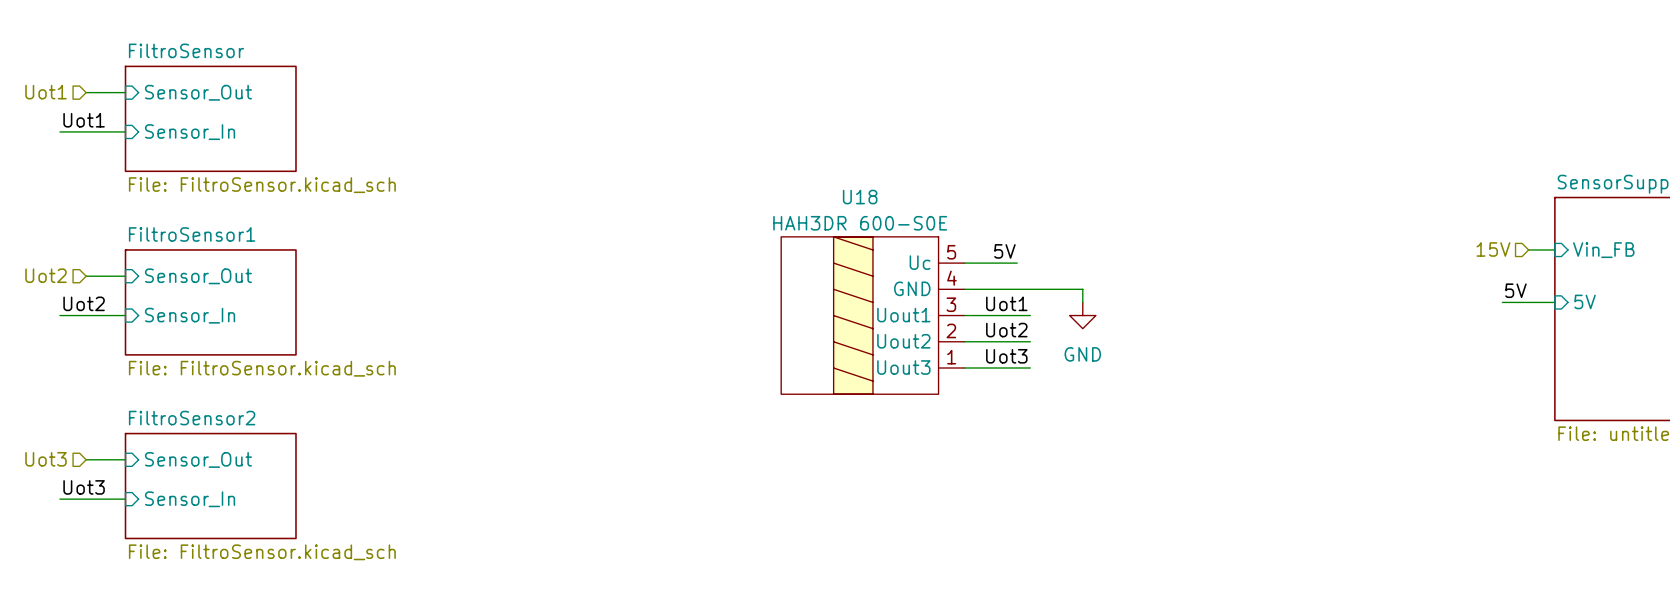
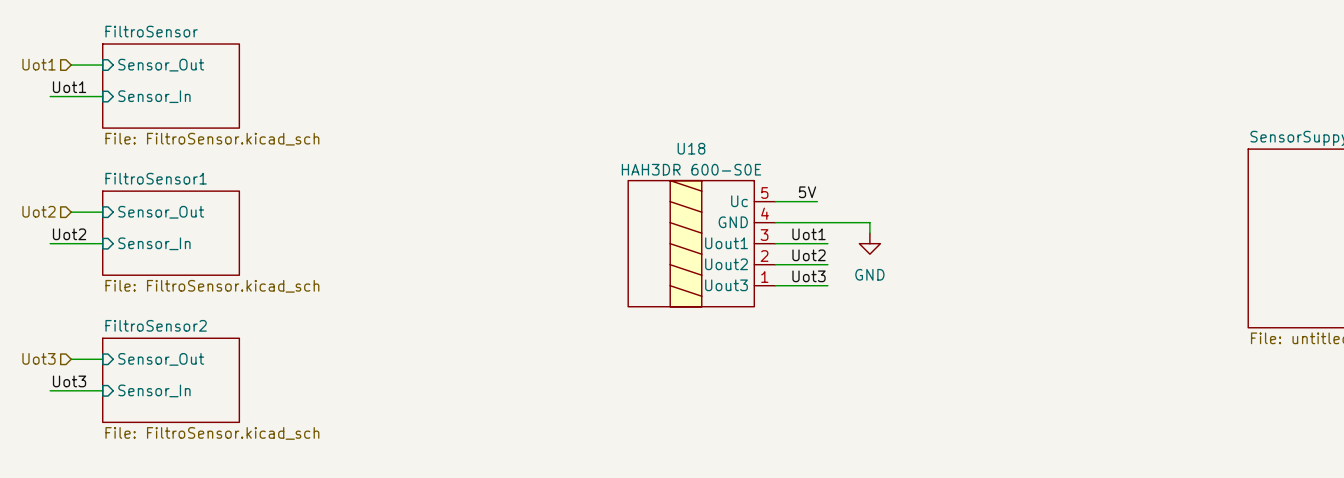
hierarchical label: 15V (1493, 249) -> none
wire: (1528, 249) (1554, 249) -> none
sheet pin: Vin_FB (1603, 250) -> none
label: 5V (1515, 290) -> none
sheet pin: 5V (1585, 301) -> none
wire: (1502, 302) (1554, 302) -> none

